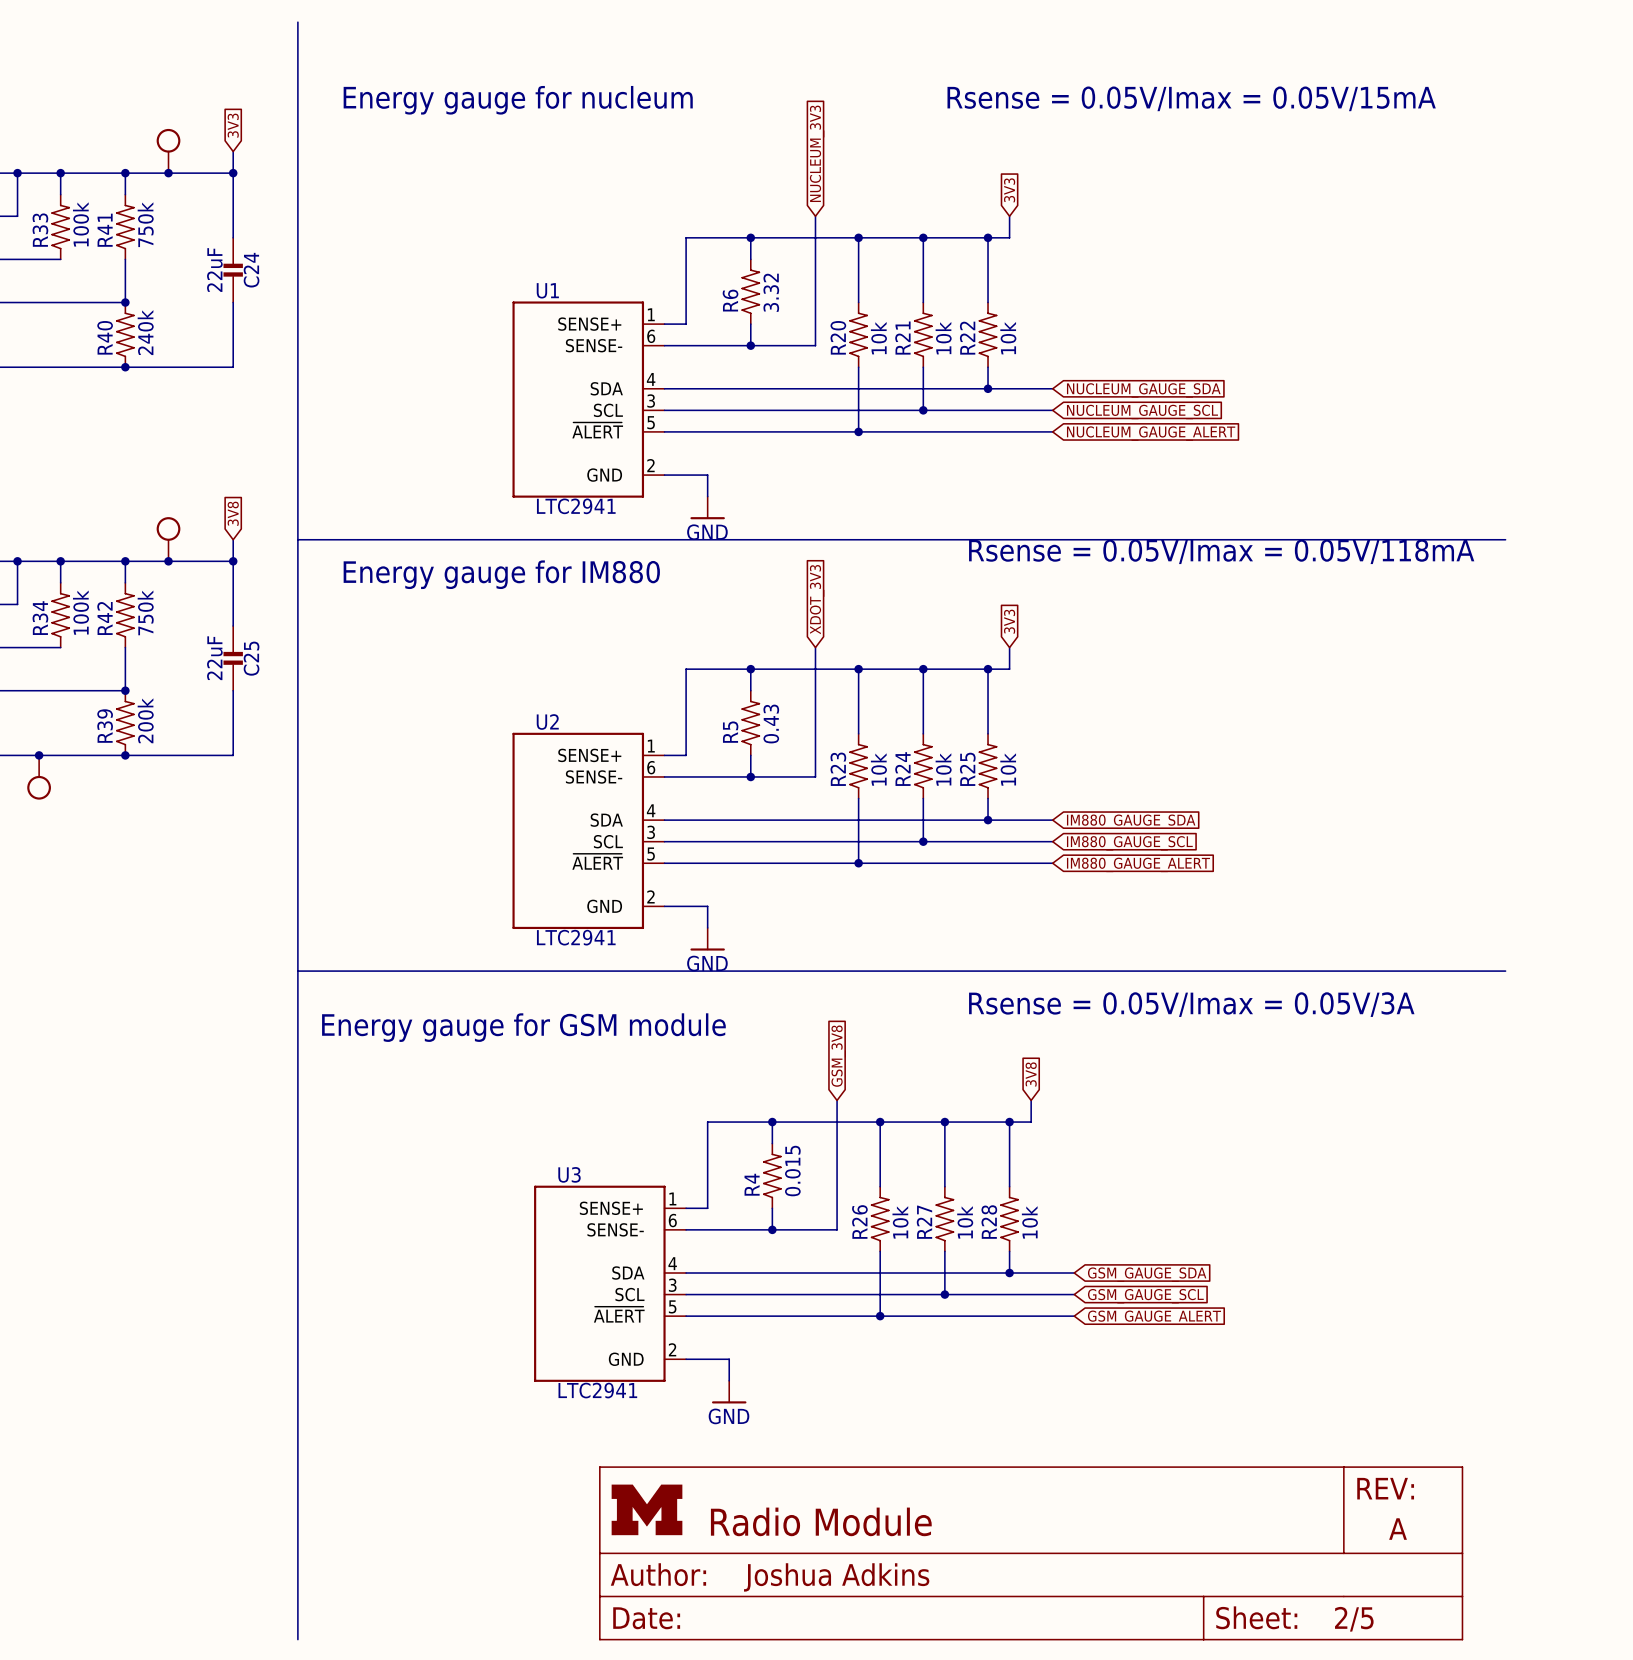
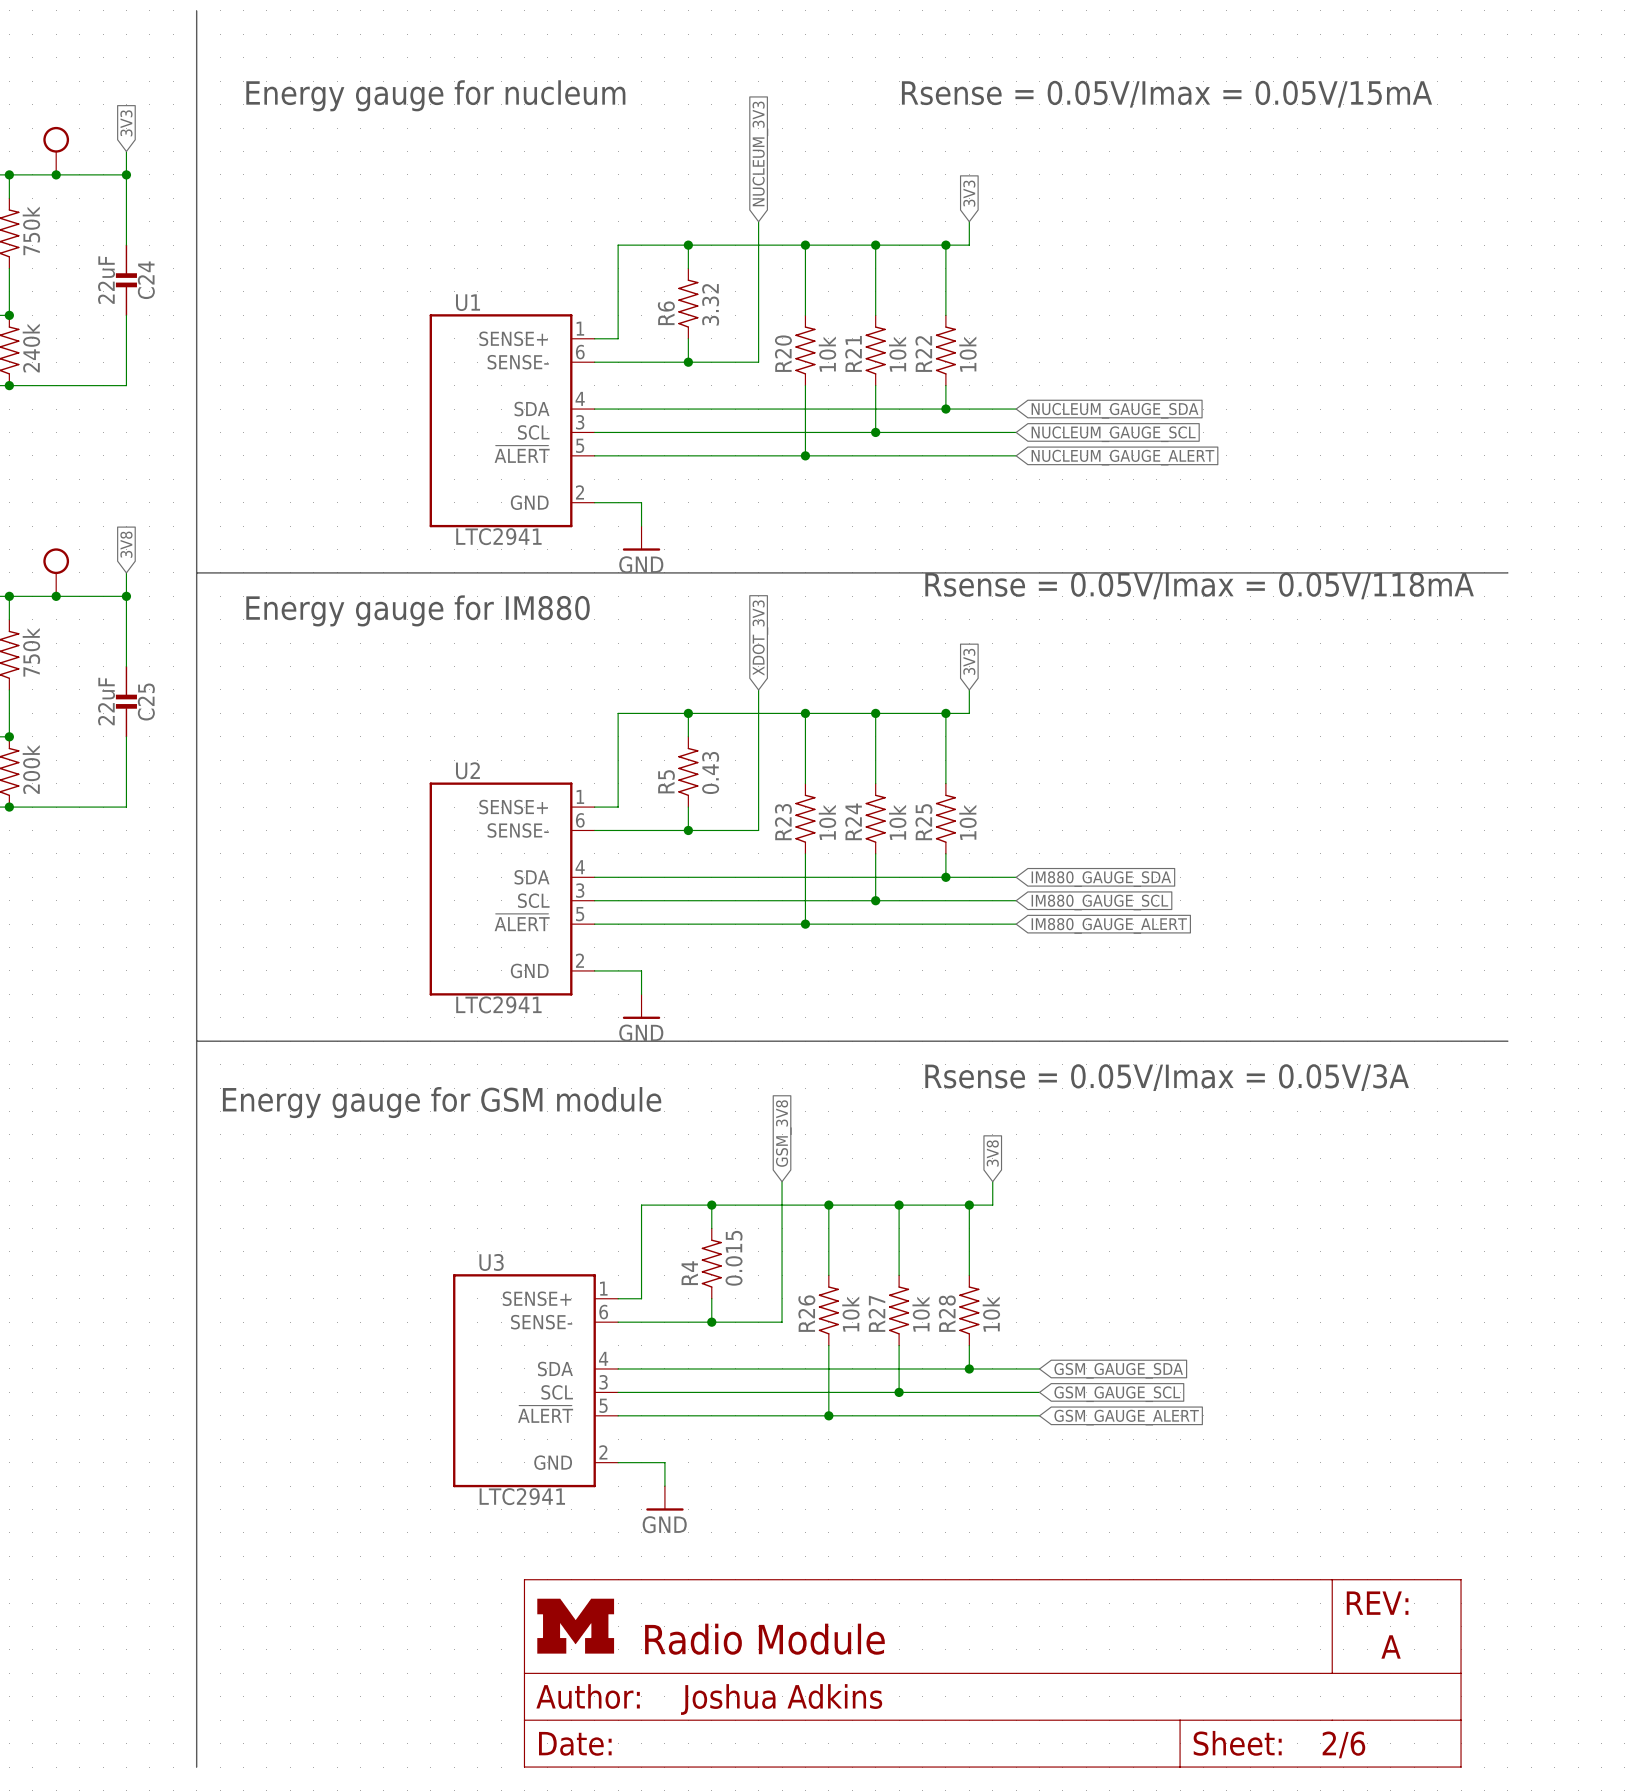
part text: 2/5 (1354, 1619) -> 2/6 (1343, 1744)

